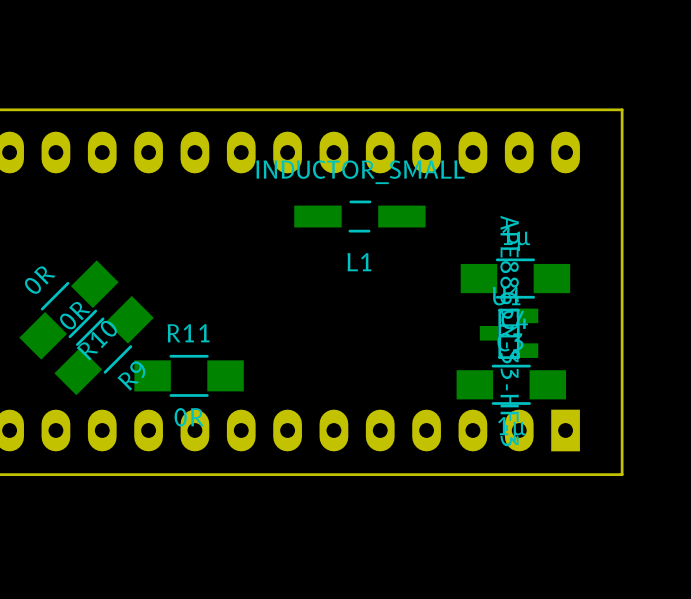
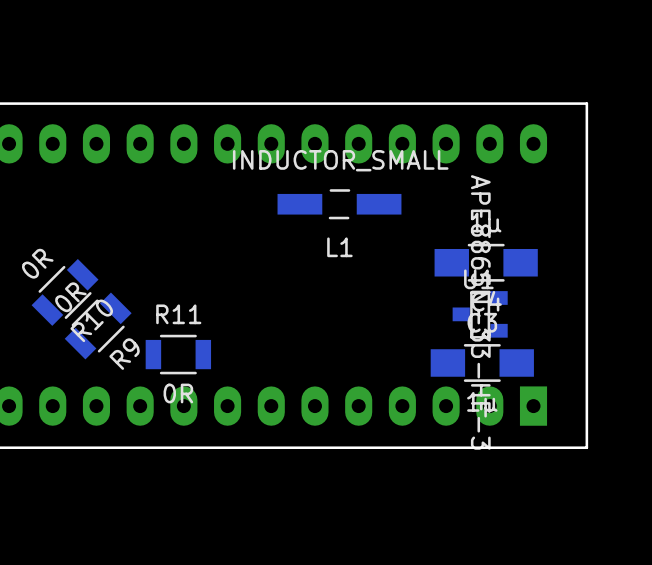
R10 footprint: [19, 260, 119, 360] -> [31, 258, 99, 326]
R9 footprint: [54, 295, 154, 396] -> [64, 292, 132, 360]
R11 footprint: [134, 354, 244, 397] -> [145, 334, 212, 375]

